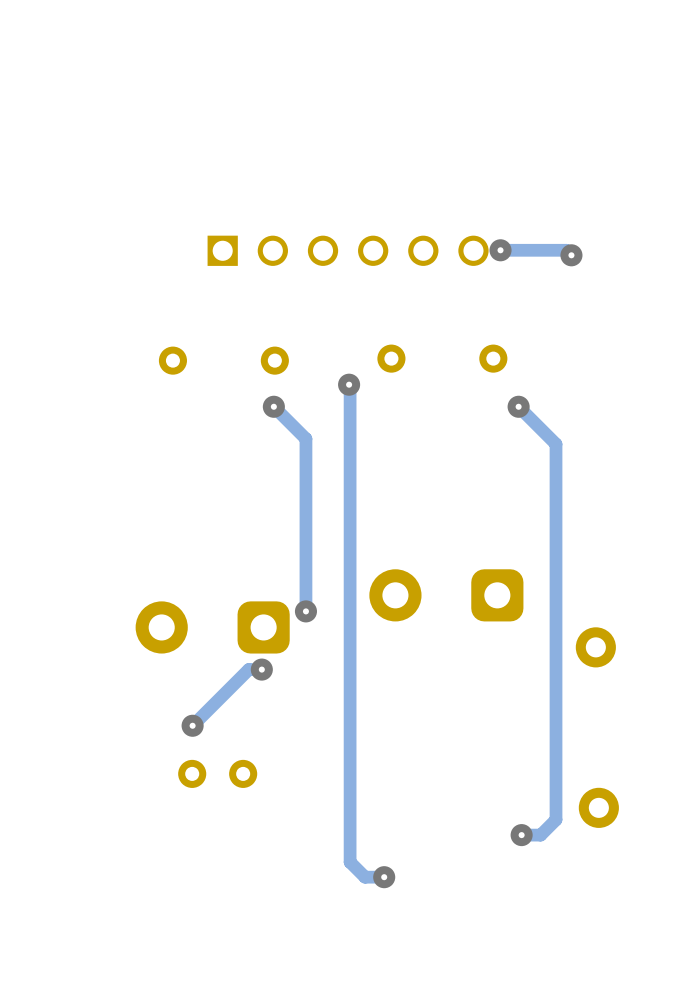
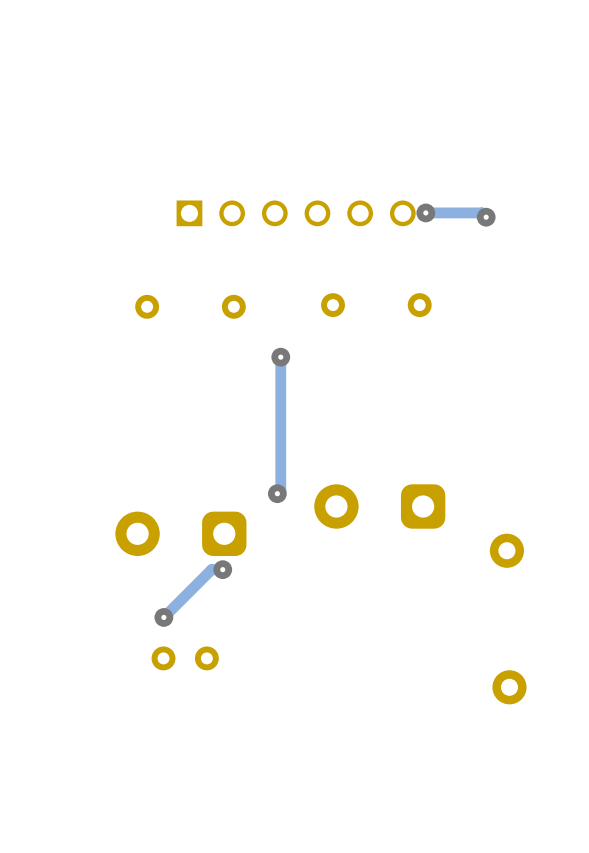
via: (349, 384) -> none
track: (350, 384) (350, 862) (365, 877) (384, 877) -> none
track: (273, 406) (305, 438) (305, 611) -> none
via: (273, 406) -> none
track: (518, 406) (556, 444) (556, 819) (540, 835) (521, 835) -> none
via: (518, 406) -> none
track: none -> (280, 357) (280, 490) (277, 493)
via: none -> (280, 357)
via position: (305, 611) -> (277, 493)
via: (521, 835) -> none
via: (384, 877) -> none

